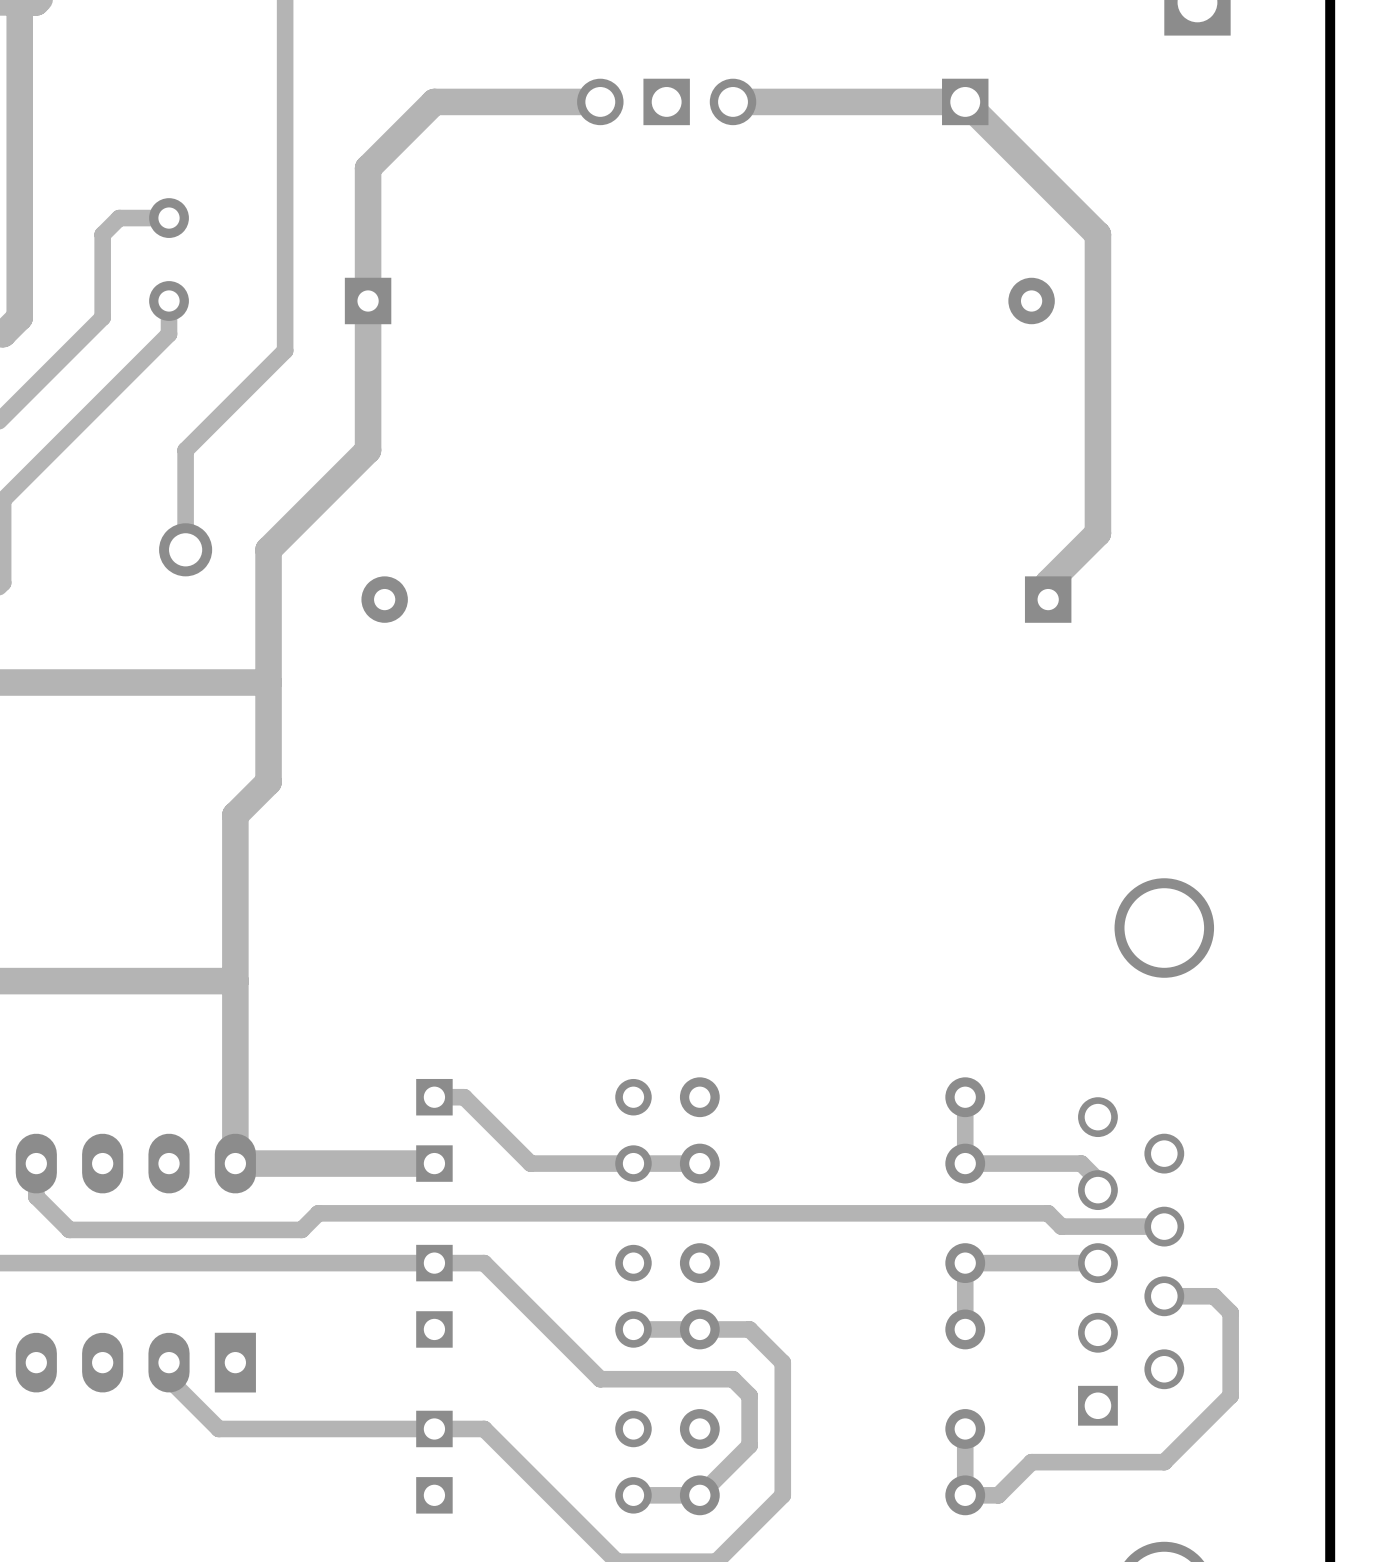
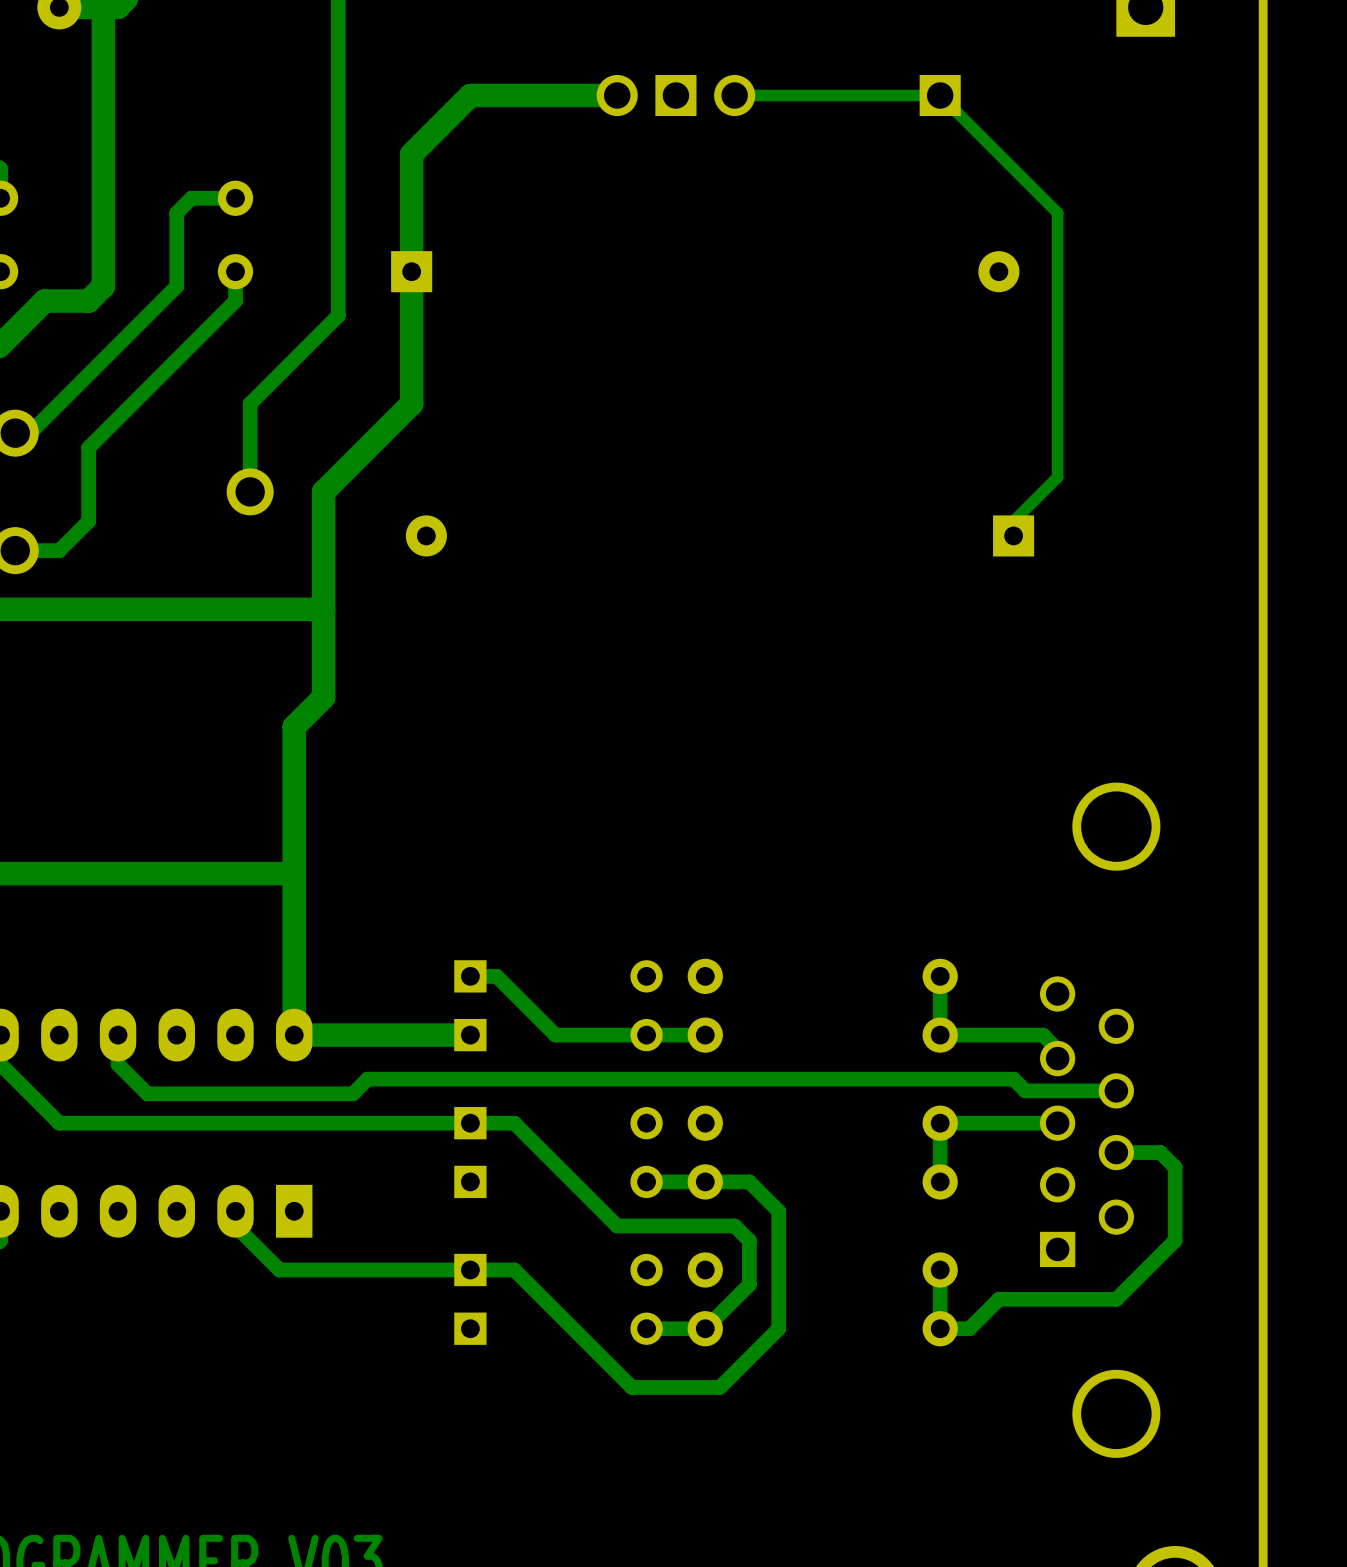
track width: thick (733, 101) (965, 101) (1097, 234) (1097, 533) (1048, 582) (1048, 599) -> thin (734, 95) (940, 95) (1057, 212) (1057, 477) (1013, 521) (1013, 535)

